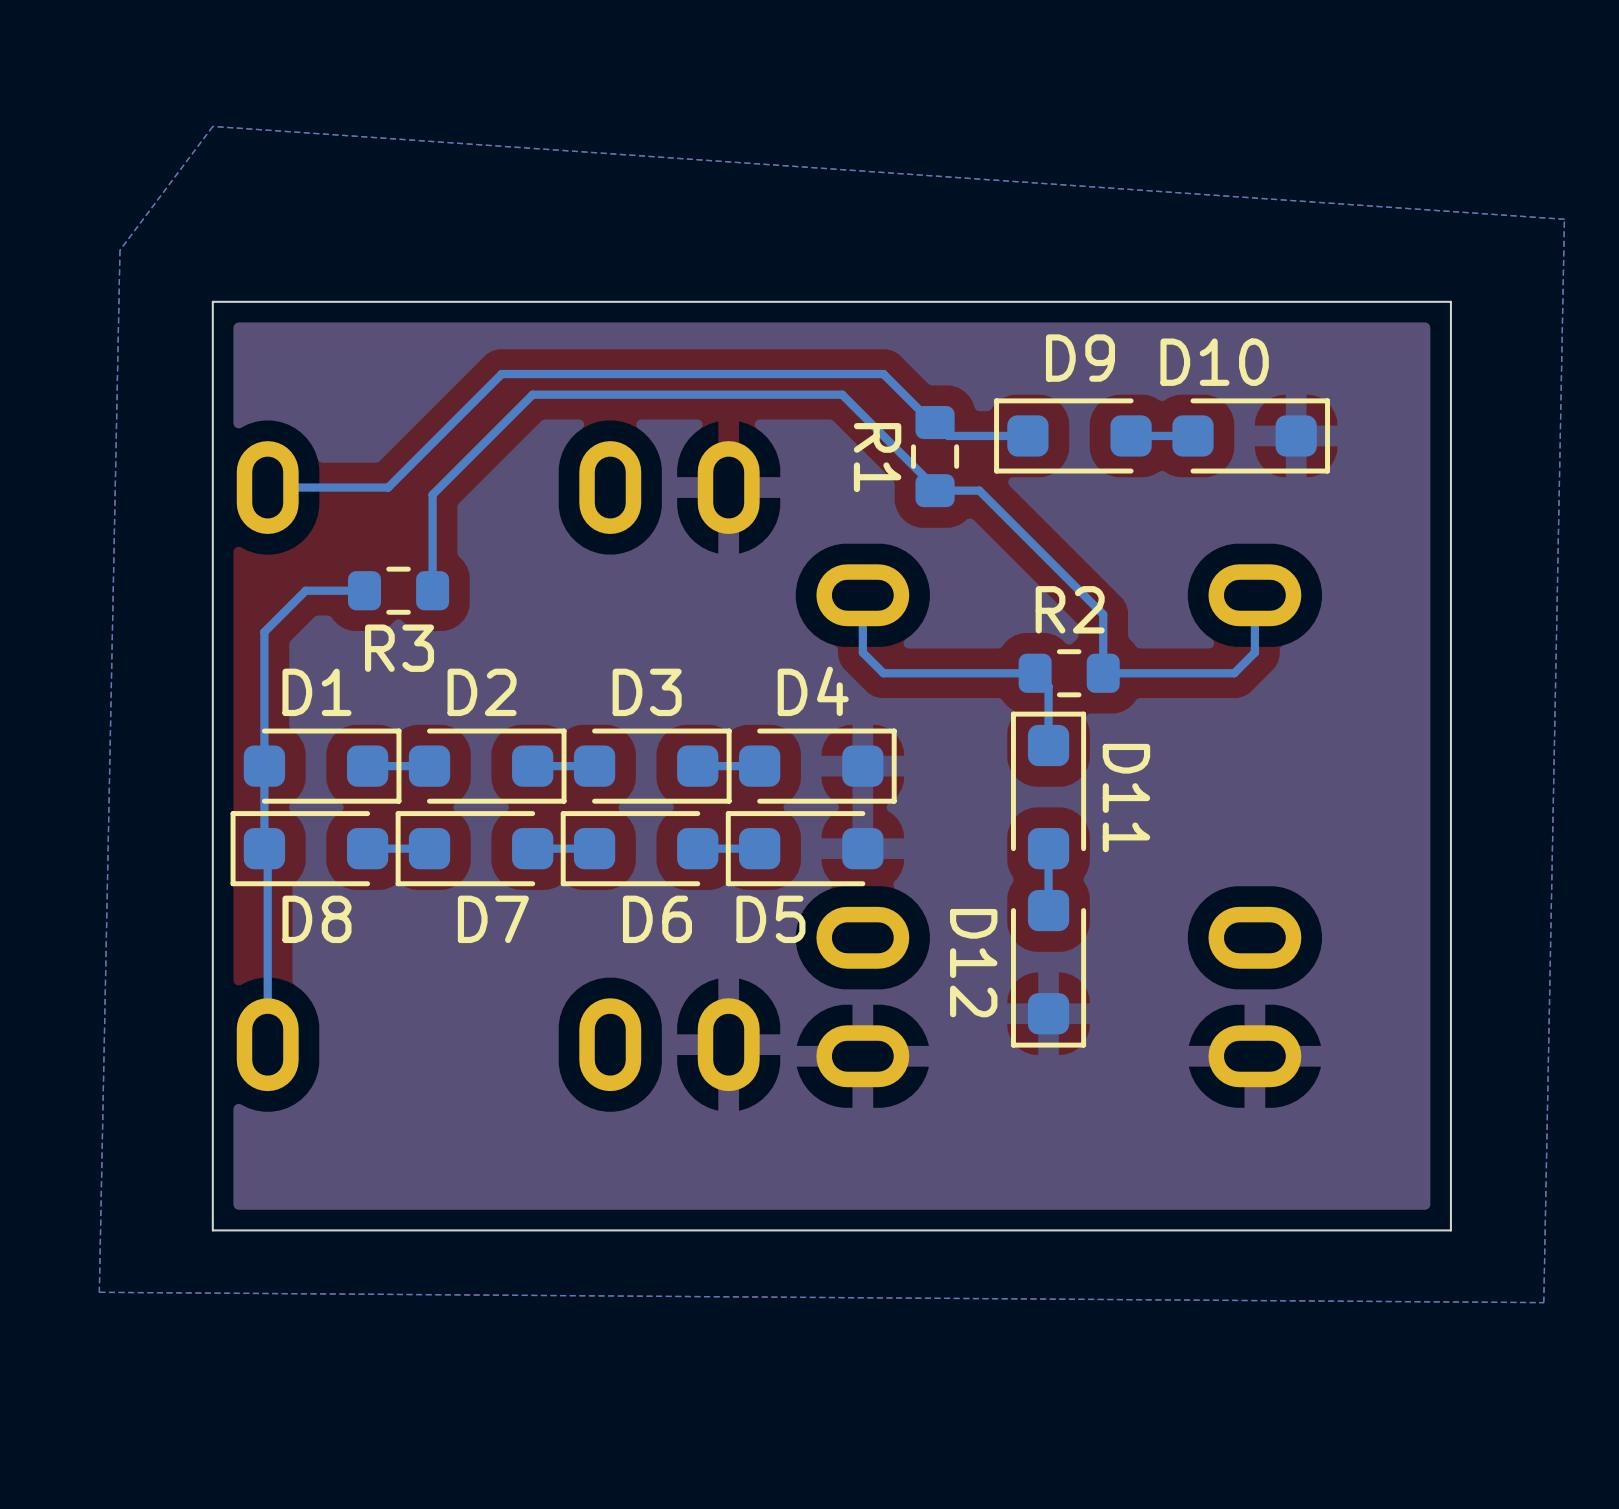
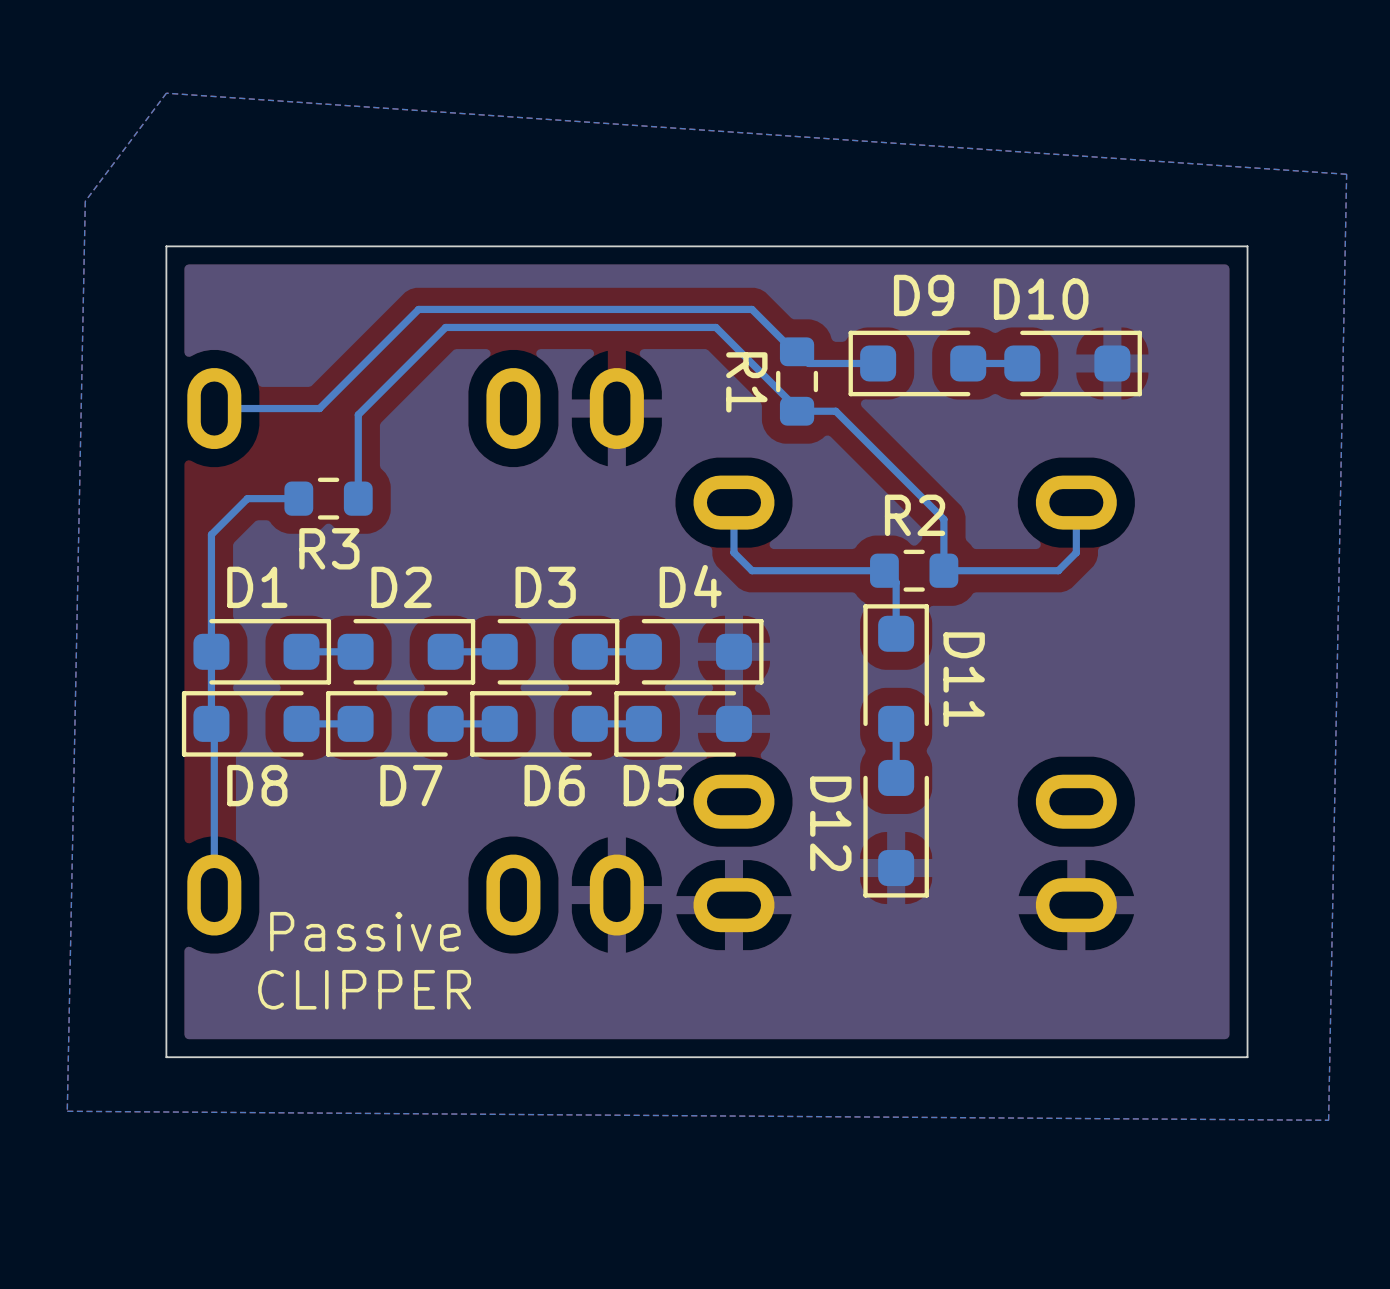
text: none -> Passive (365, 931)
text: none -> CLIPPER (364, 989)

